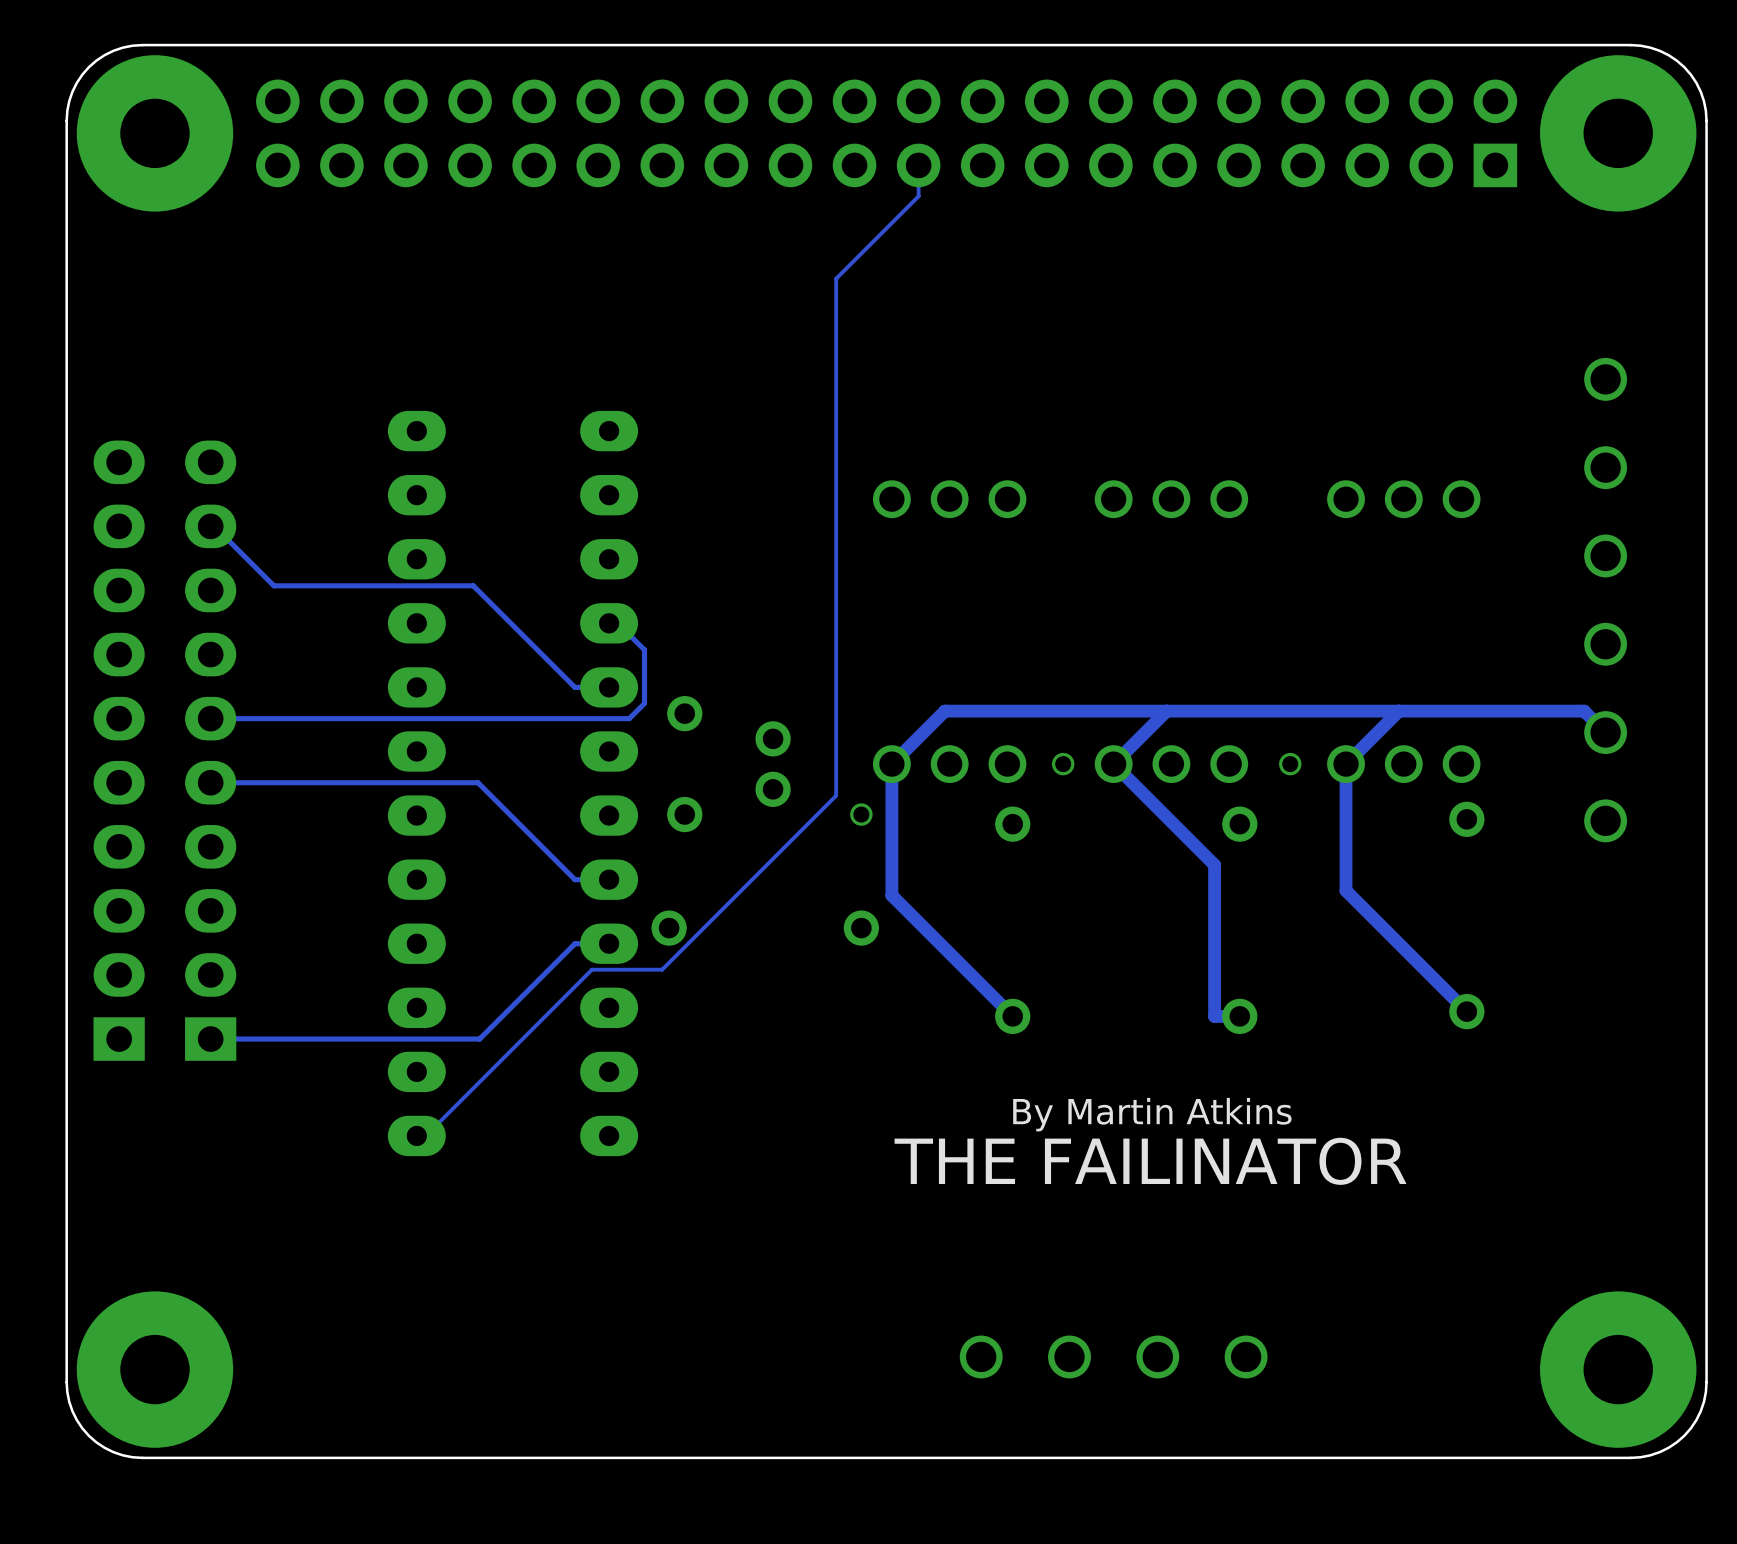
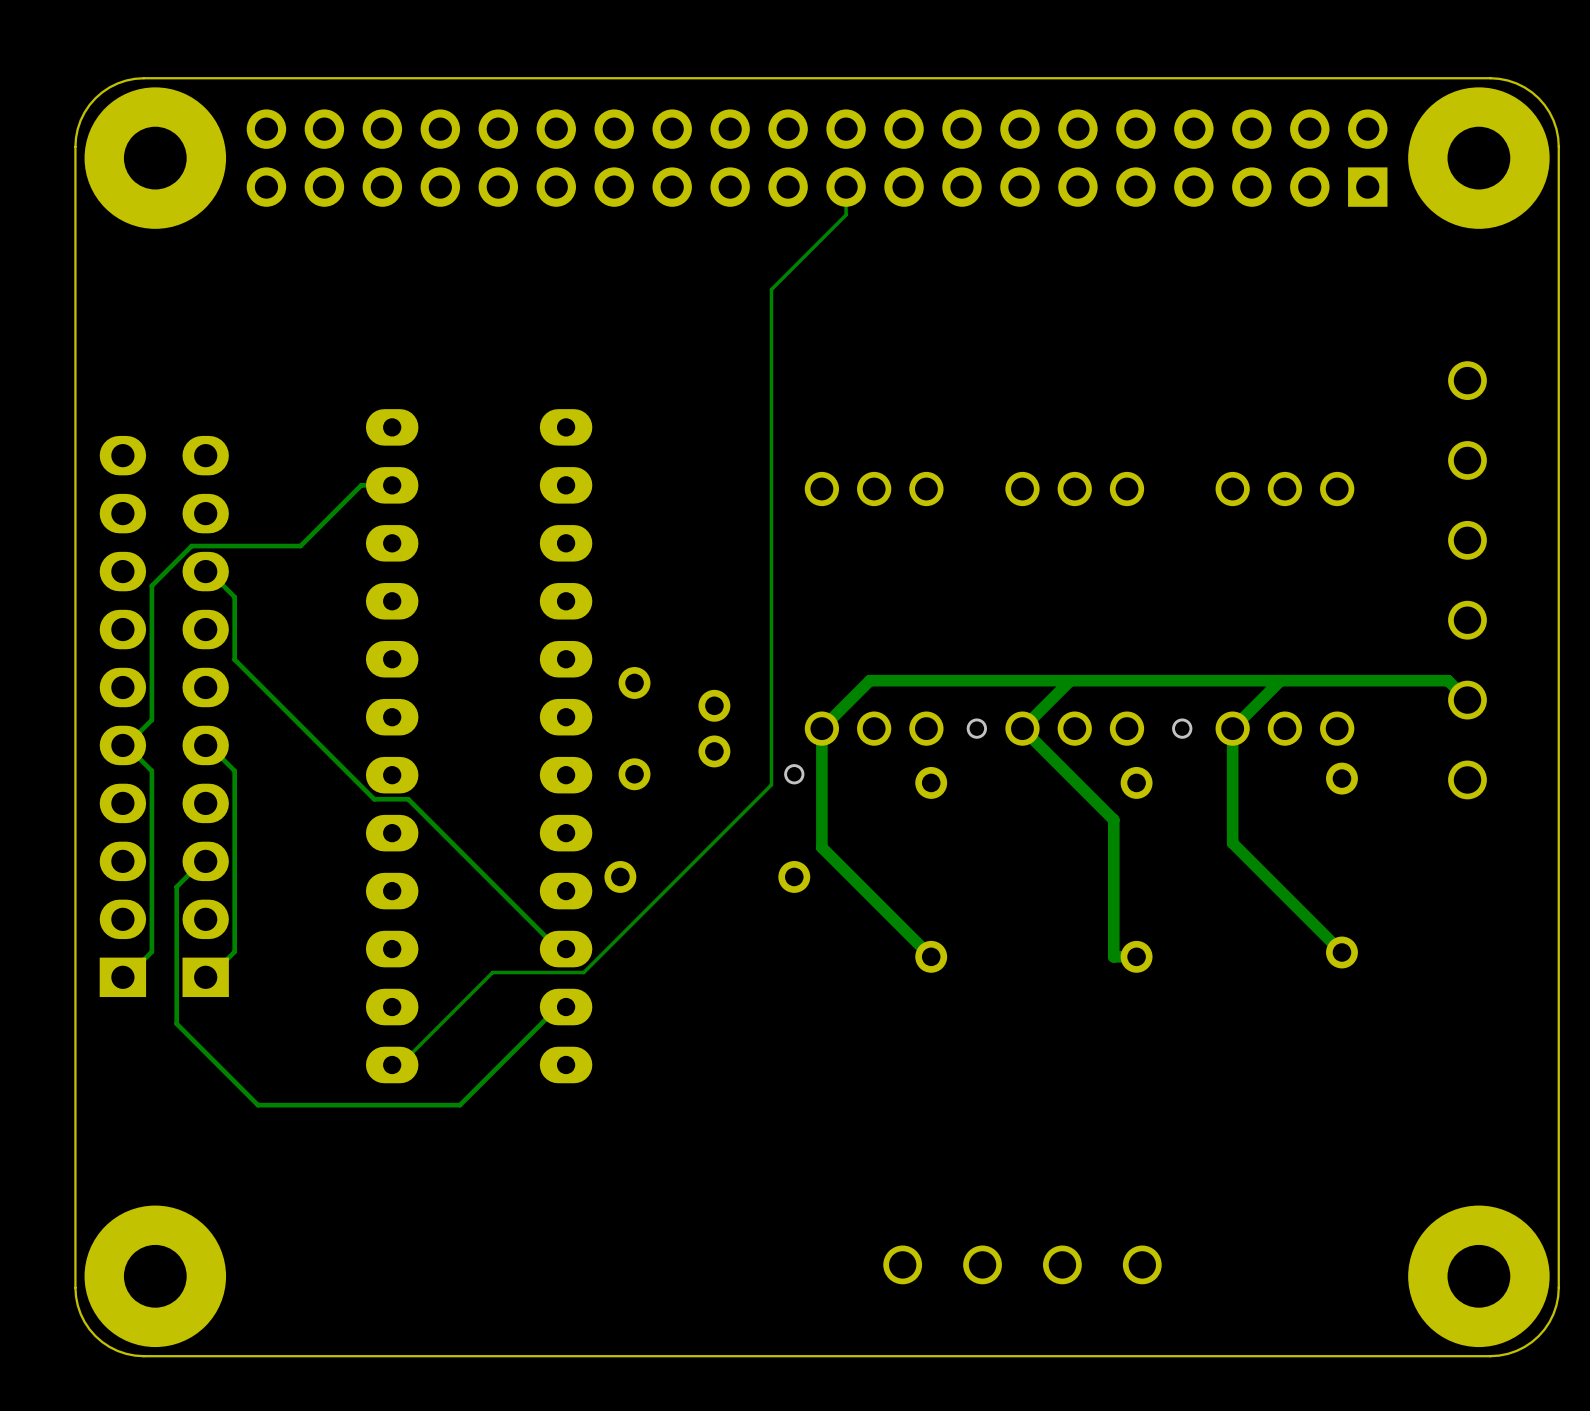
track: none -> (392, 485) (361, 485) (300, 546) (191, 546) (151, 585) (151, 719) (126, 745)
track: (214, 526) (273, 585) (473, 585) (574, 687) (609, 687) -> none
track: none -> (205, 571) (209, 571) (234, 597) (234, 659) (374, 799) (408, 799) (558, 949) (566, 949)
track: (617, 623) (644, 649) (644, 703) (629, 718) (210, 718) -> none
track: none -> (126, 745) (151, 770) (151, 951) (126, 977) (122, 977)
track: (214, 782) (478, 782) (574, 879) (609, 879) -> (209, 745) (234, 770) (234, 951) (209, 977)
track: (836, 795) (662, 969) (591, 969) (527, 1033) -> (771, 757) (771, 784) (583, 972) (492, 972)
track: none -> (205, 861) (202, 861) (176, 886) (176, 1023) (258, 1105) (459, 1105) (558, 1007) (566, 1007)
track: (609, 943) (574, 943) (479, 1039) (214, 1039) -> none
text: By Martin Atkins (1152, 1114) -> none
text: THE FAILINATOR (1150, 1161) -> none

